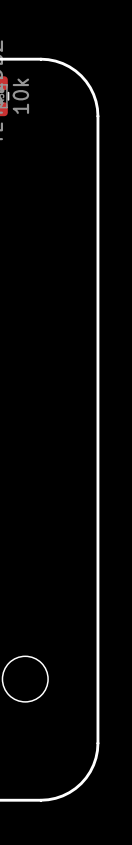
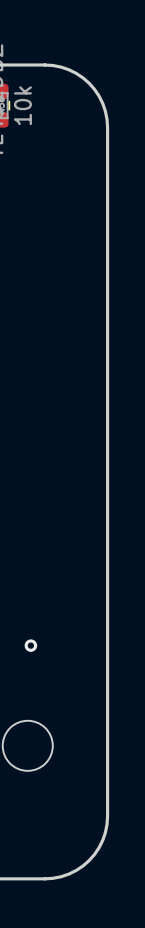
via: none -> (30, 645)

